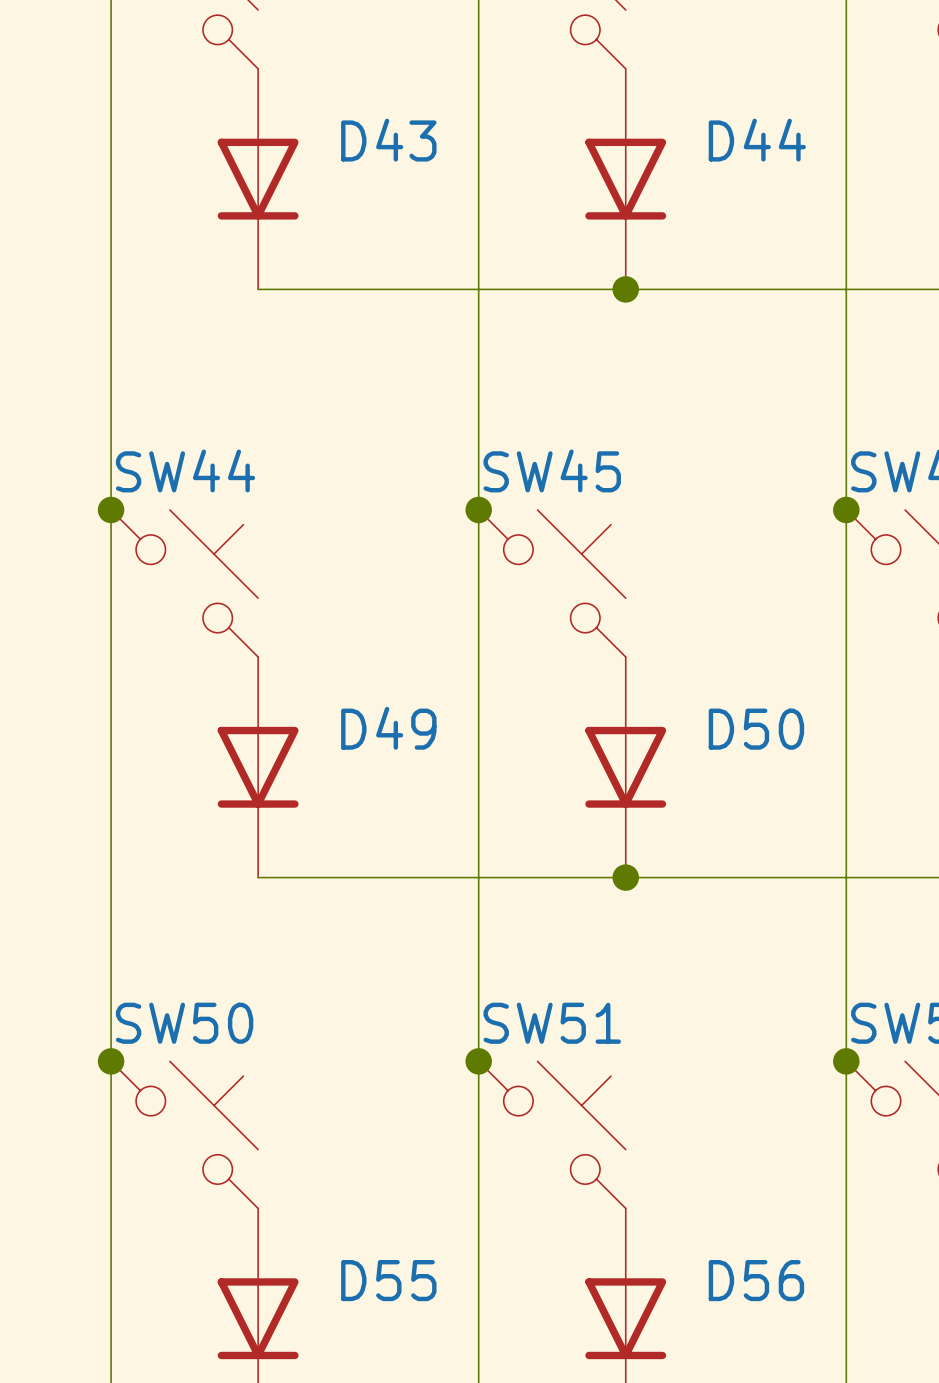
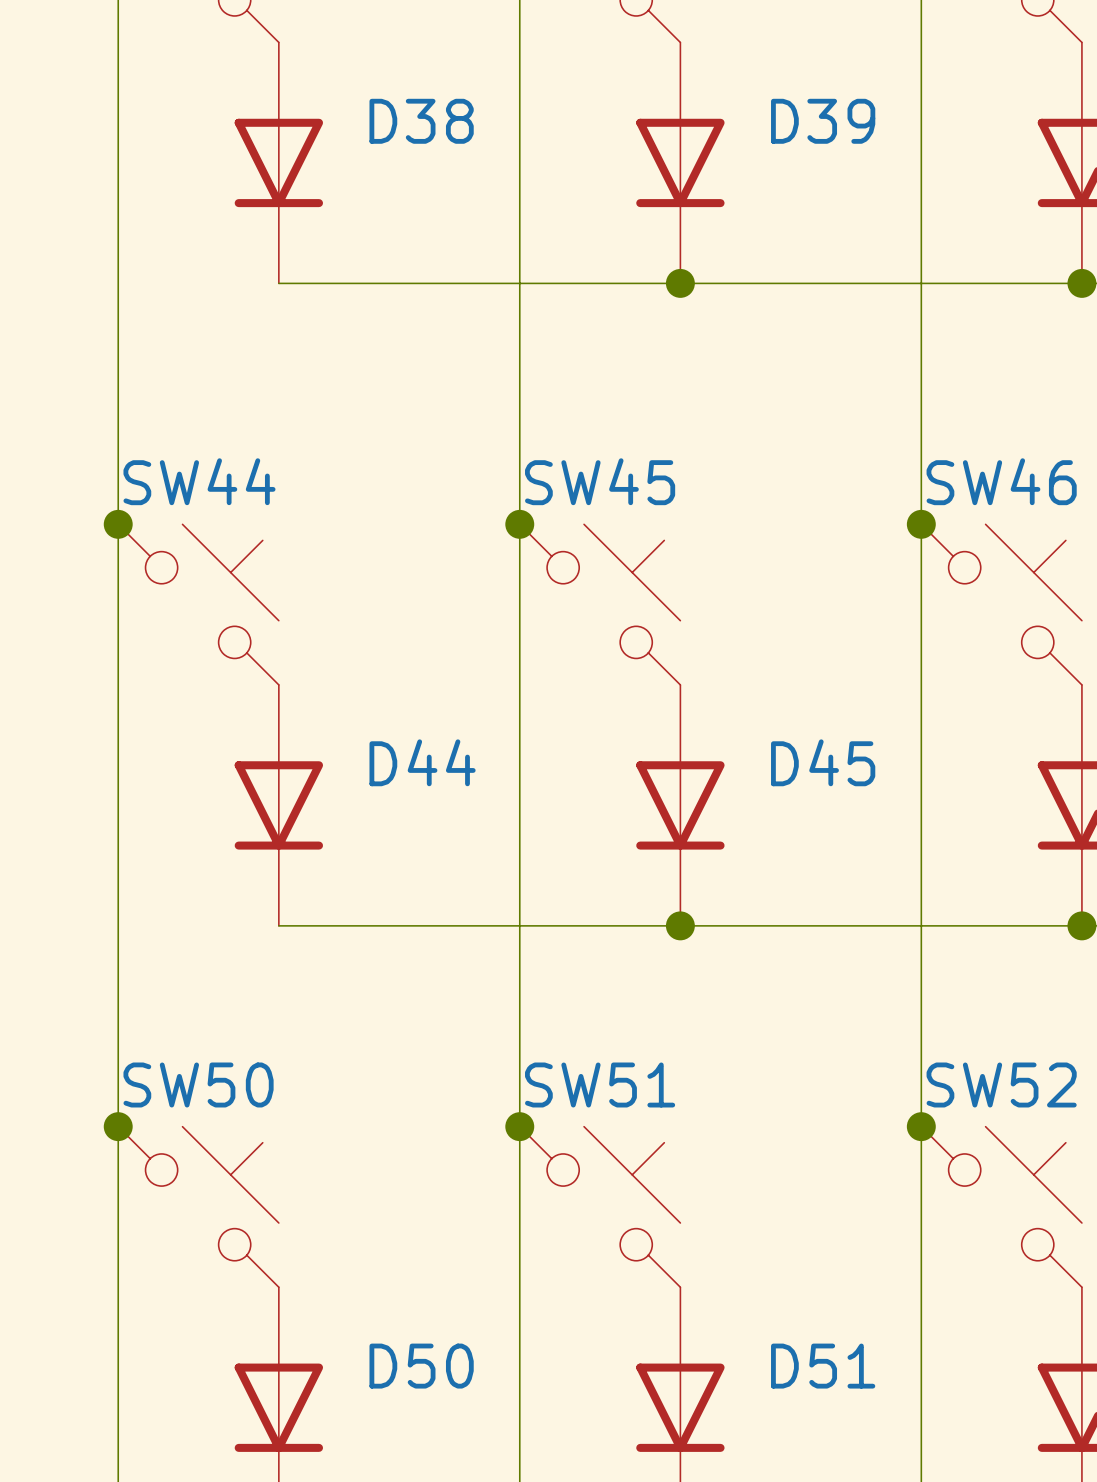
D43 name: D43 (388, 140) -> D38 (421, 121)
D44 name: D44 (757, 140) -> D39 (823, 121)
D49 name: D49 (388, 728) -> D44 (422, 762)
D50 name: D50 (756, 729) -> D45 (823, 762)
D55 name: D55 (388, 1280) -> D50 (421, 1366)
D56 name: D56 (756, 1280) -> D51 (823, 1366)

